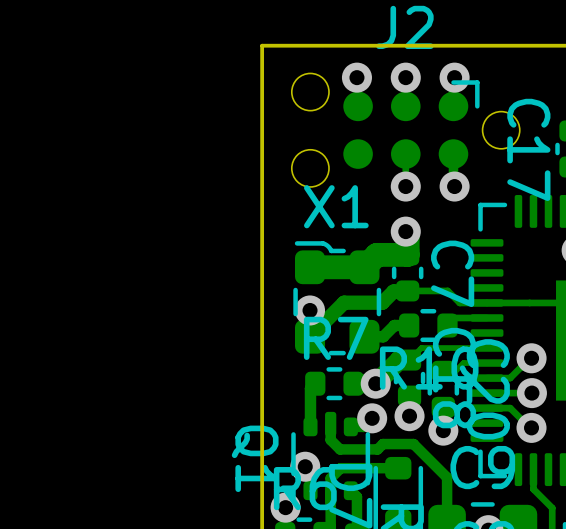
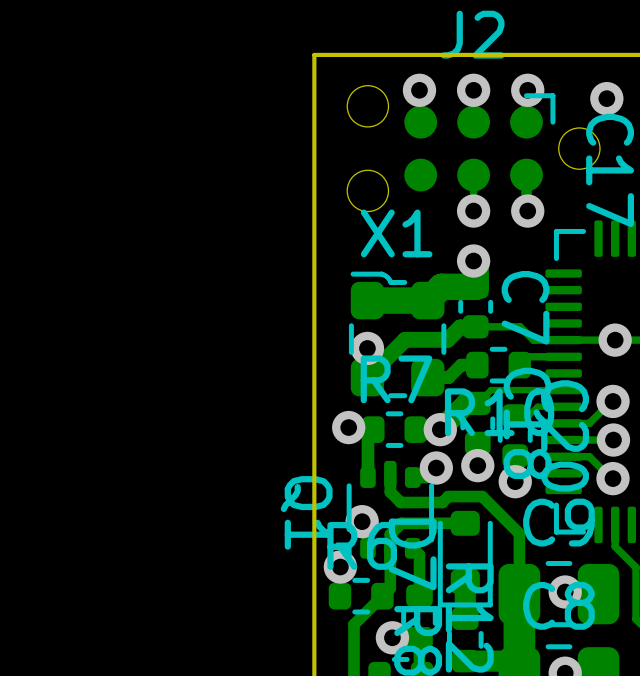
via: none -> (606, 98)
via: none -> (615, 340)
via: none -> (348, 427)

